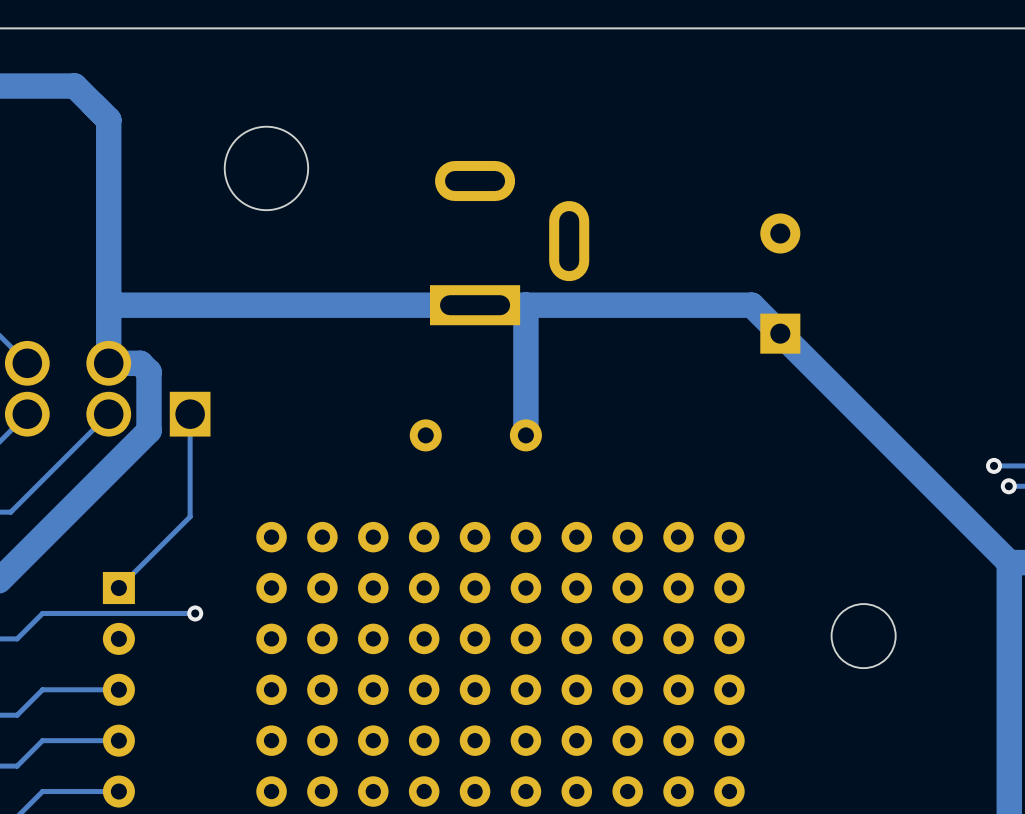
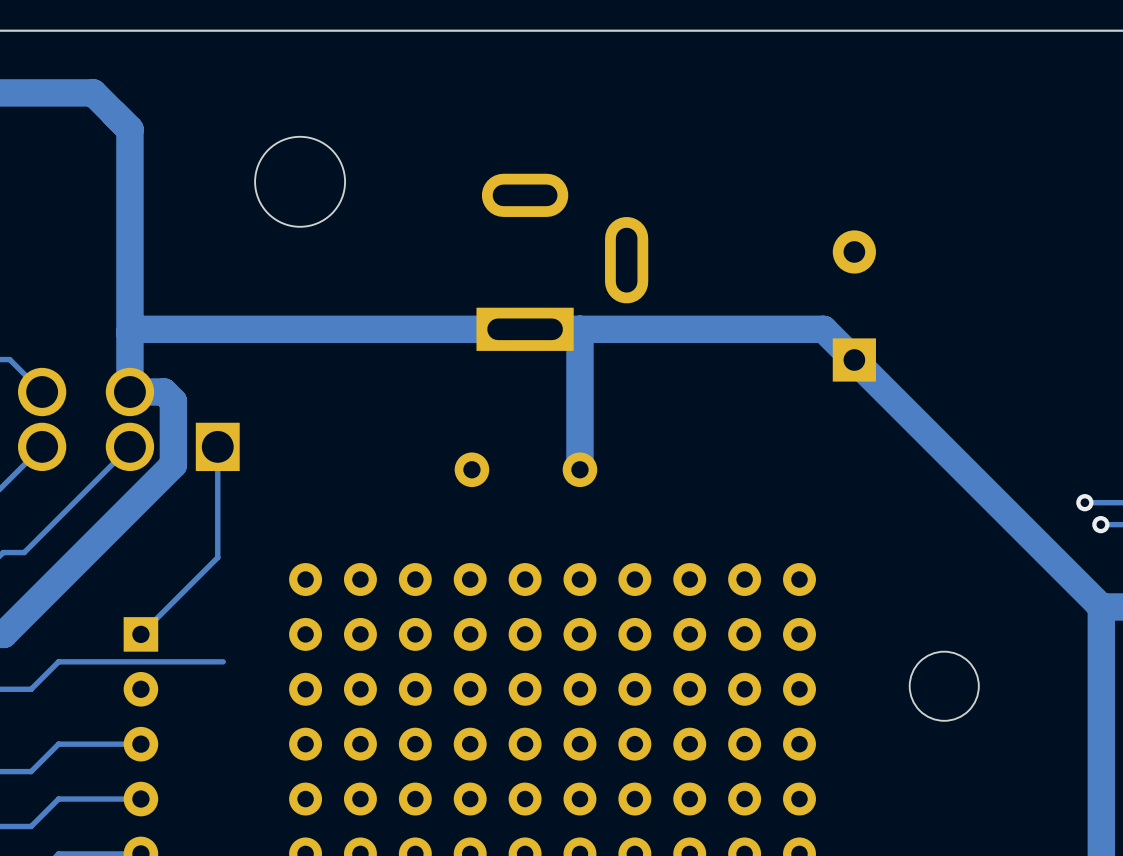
via: (195, 613) -> none

